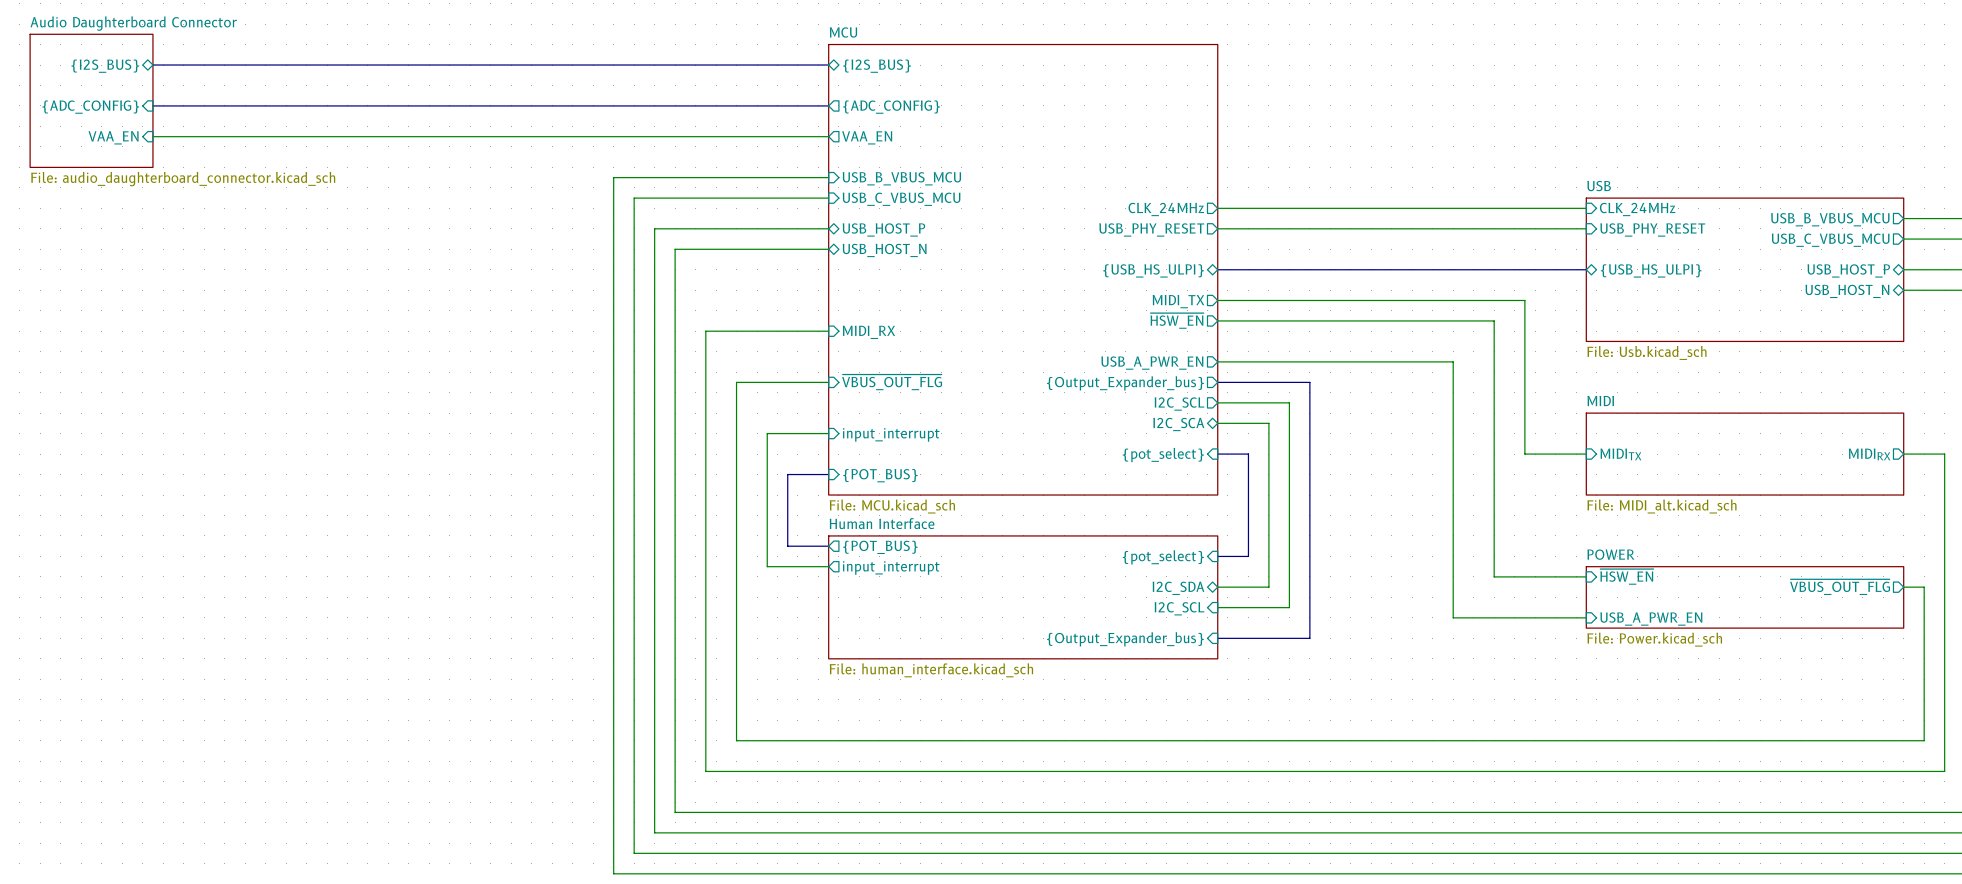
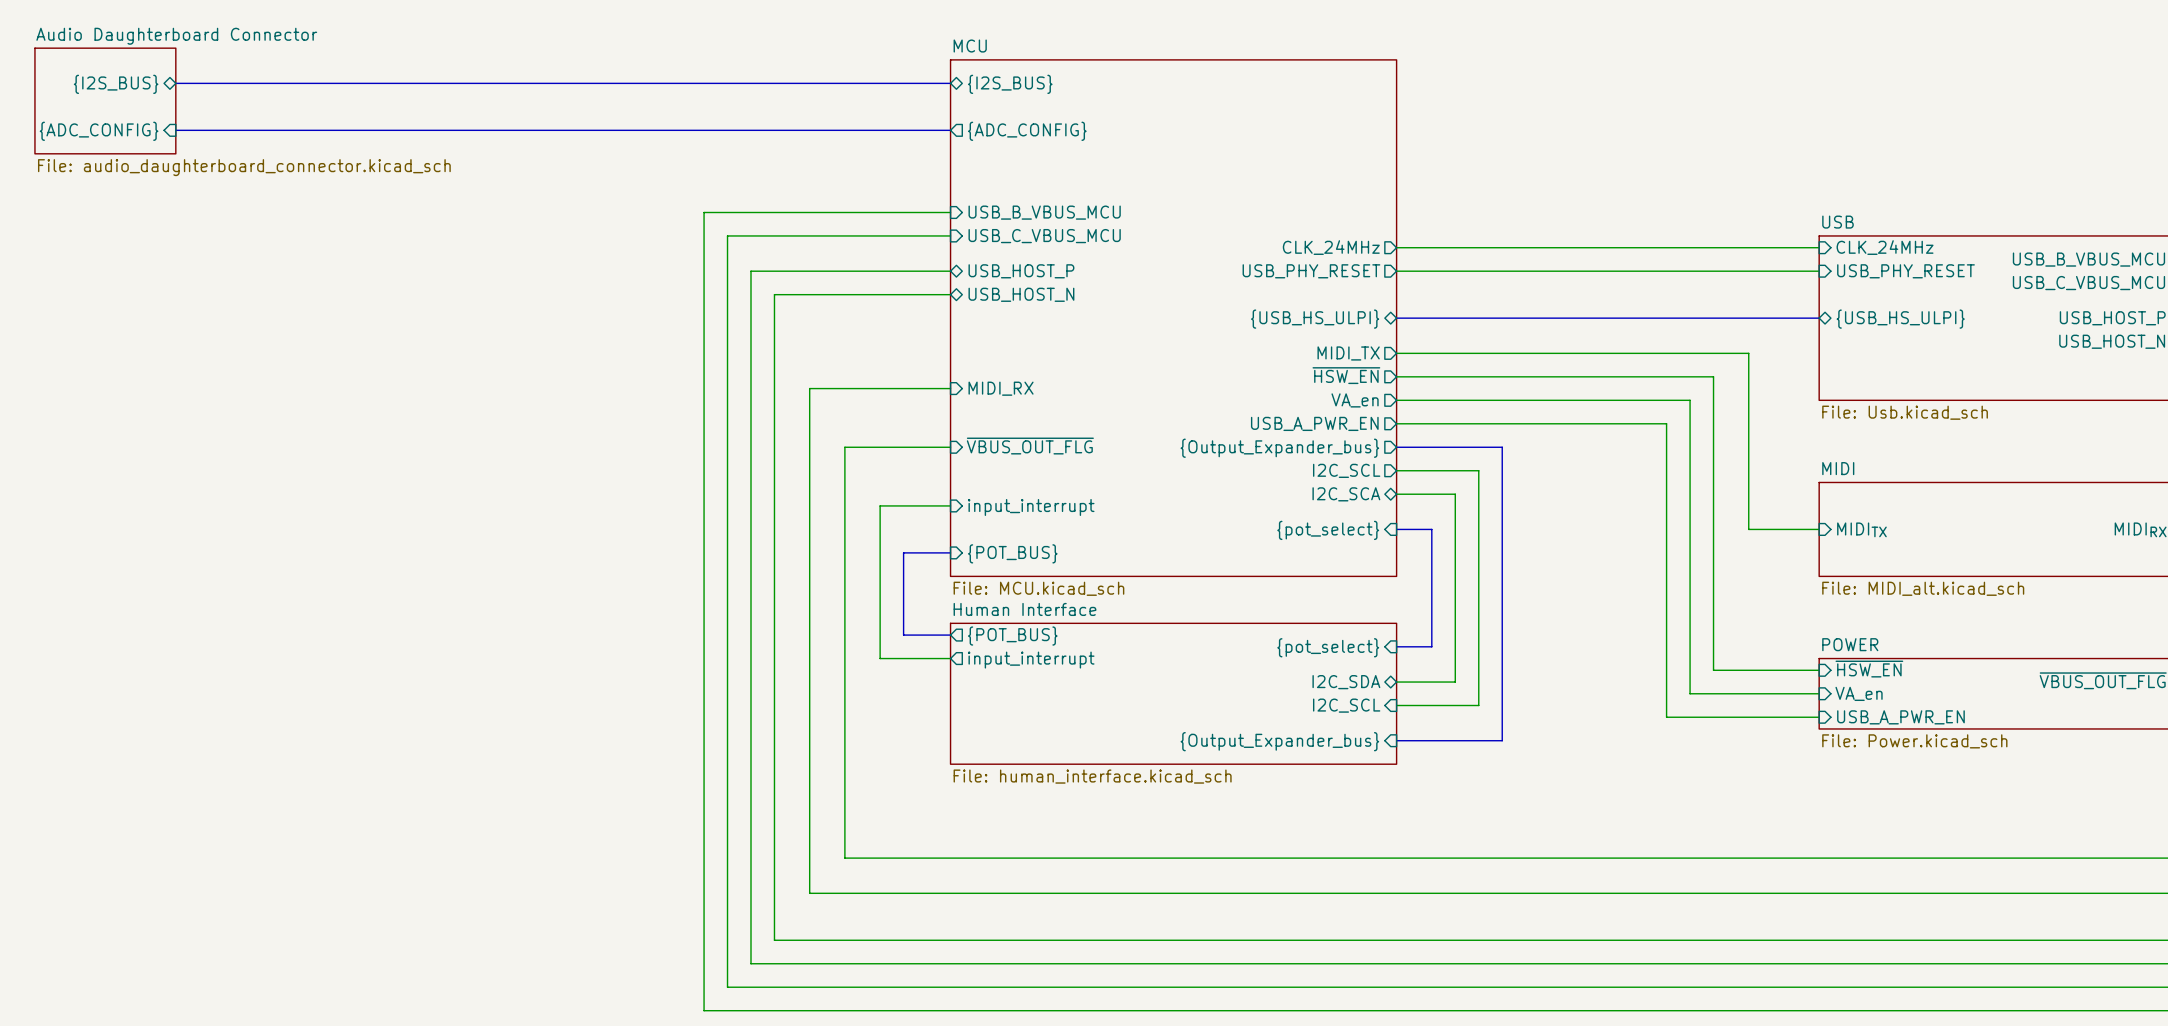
sheet Audio Daughterboard Connector: none -> File: audio_daughterboard_connector.kicad_sch (105, 100)
sheet Audio Daughterboard Connector: File: audio_daughterboard_connector.kicad_sch (91, 100) -> none
wire: (152, 136) (828, 136) -> none
sheet pin: VAA_EN (113, 137) -> none
sheet pin: VAA_EN (867, 137) -> none
wire: none -> (1396, 400) (1690, 400) (1690, 693) (1819, 693)
sheet pin: none -> VA_en (1355, 400)
sheet pin: none -> VA_en (1859, 693)

